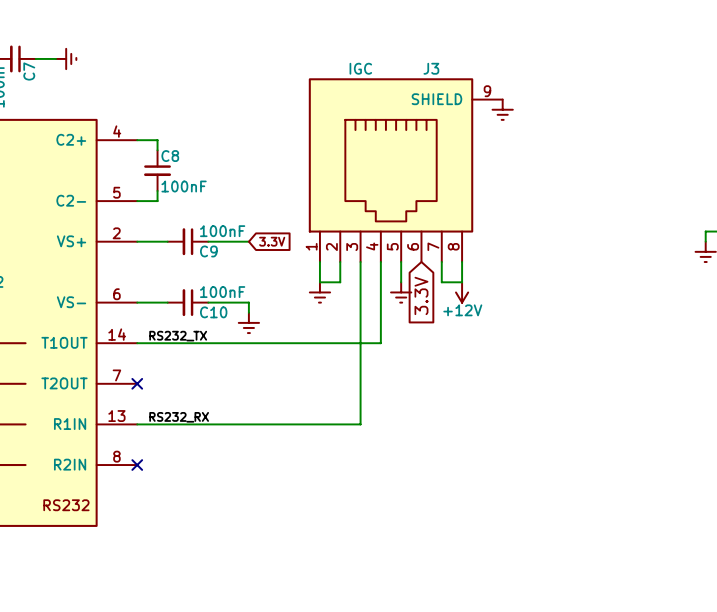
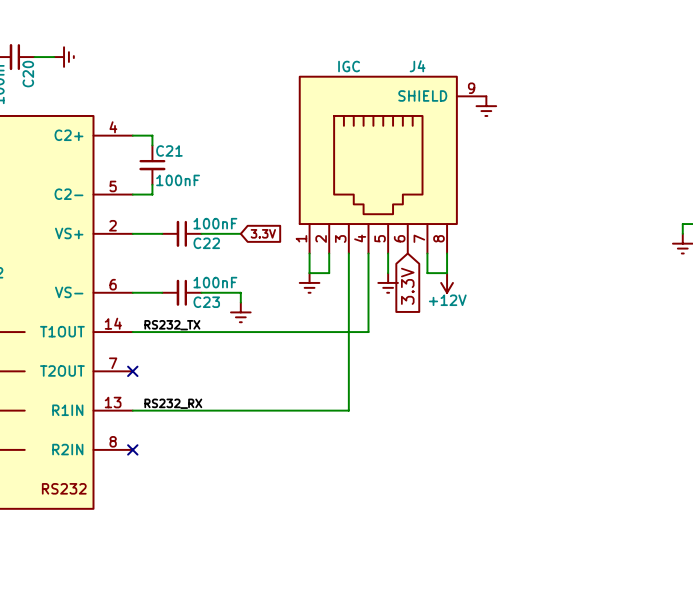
J3 name: J3 (431, 68) -> J4 (417, 66)
C7 name: C7 (29, 71) -> C20 (28, 74)
C8 name: C8 (170, 156) -> C21 (169, 150)
C9 name: C9 (208, 251) -> C22 (206, 243)
C10 name: C10 (213, 312) -> C23 (206, 302)

